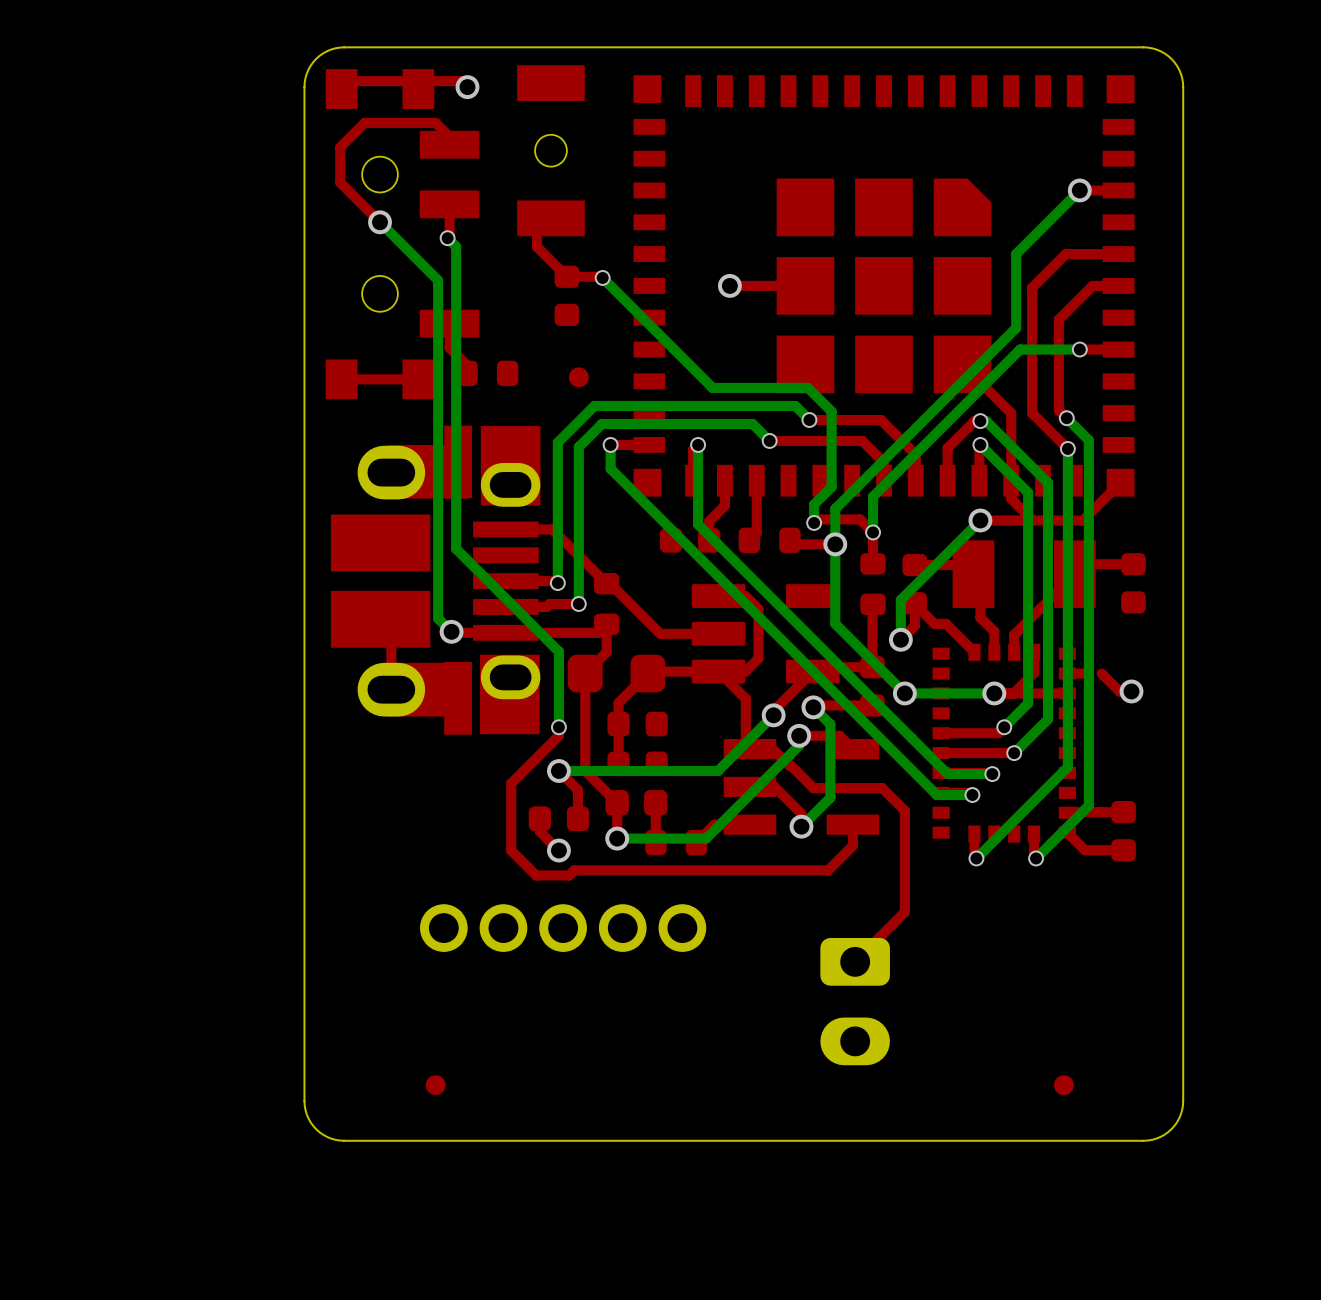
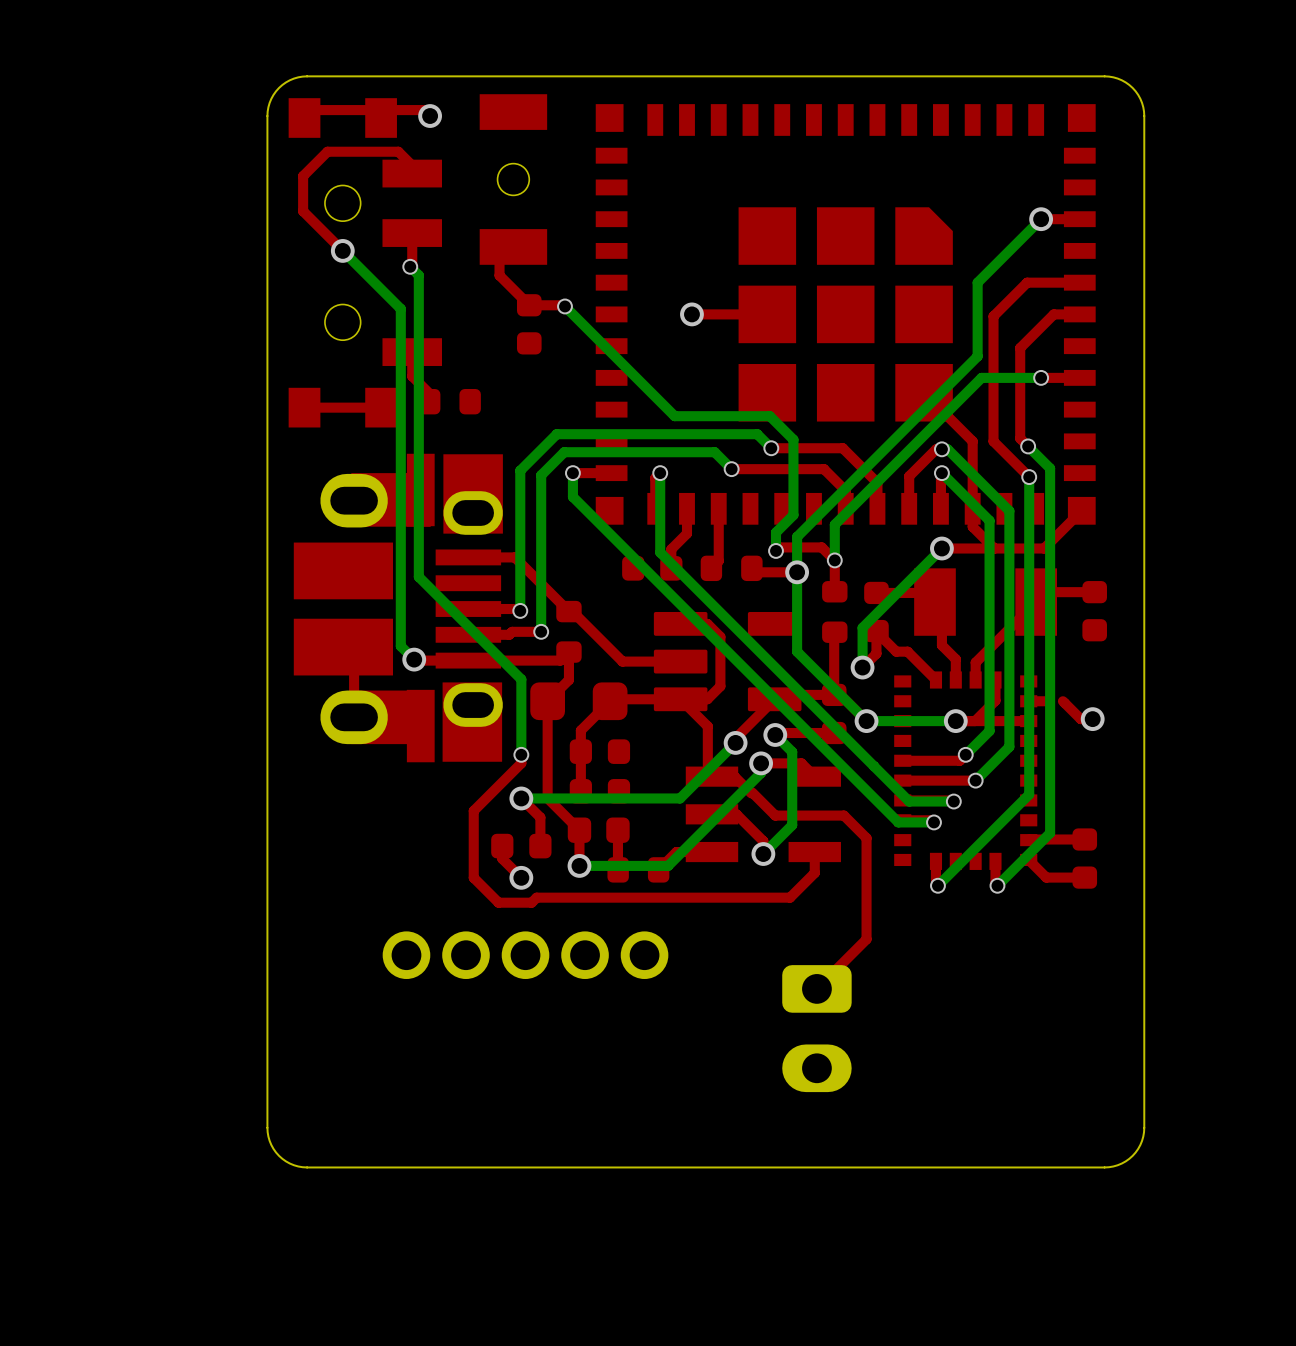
part: (578, 377) -> none
part: (435, 1085) -> none
part: (1063, 1085) -> none

